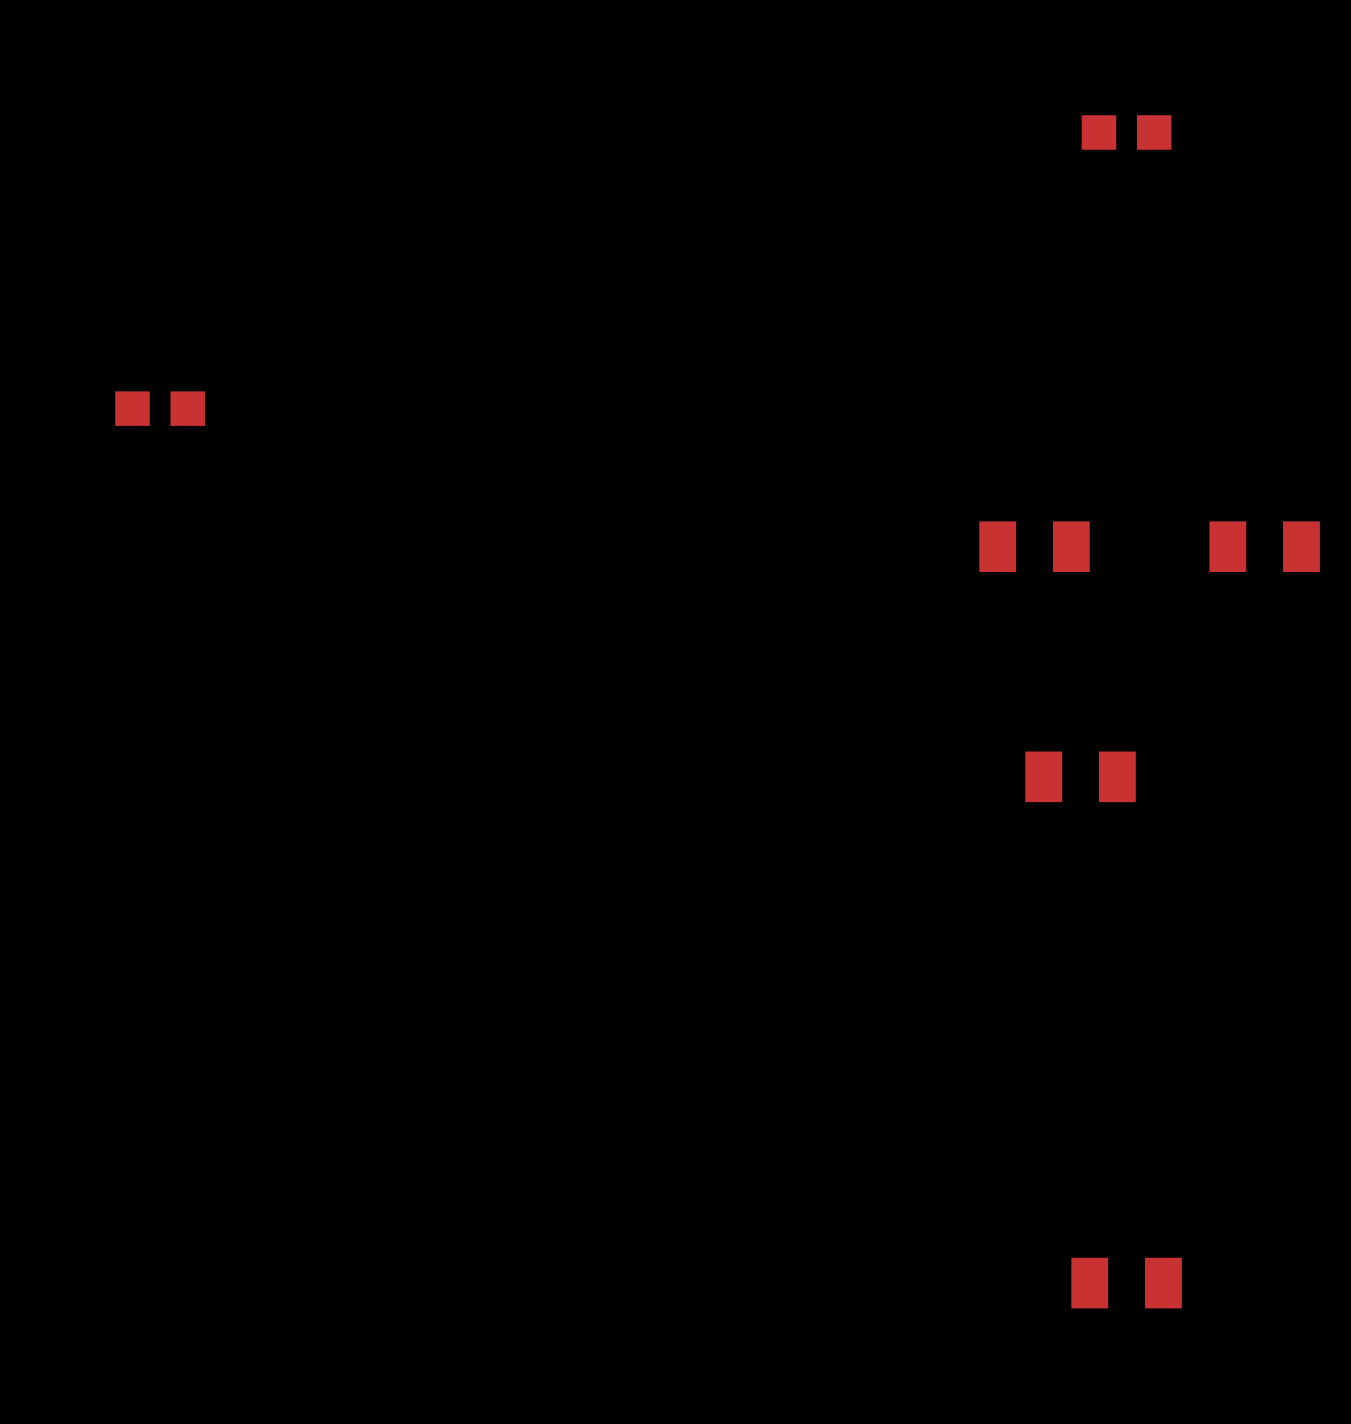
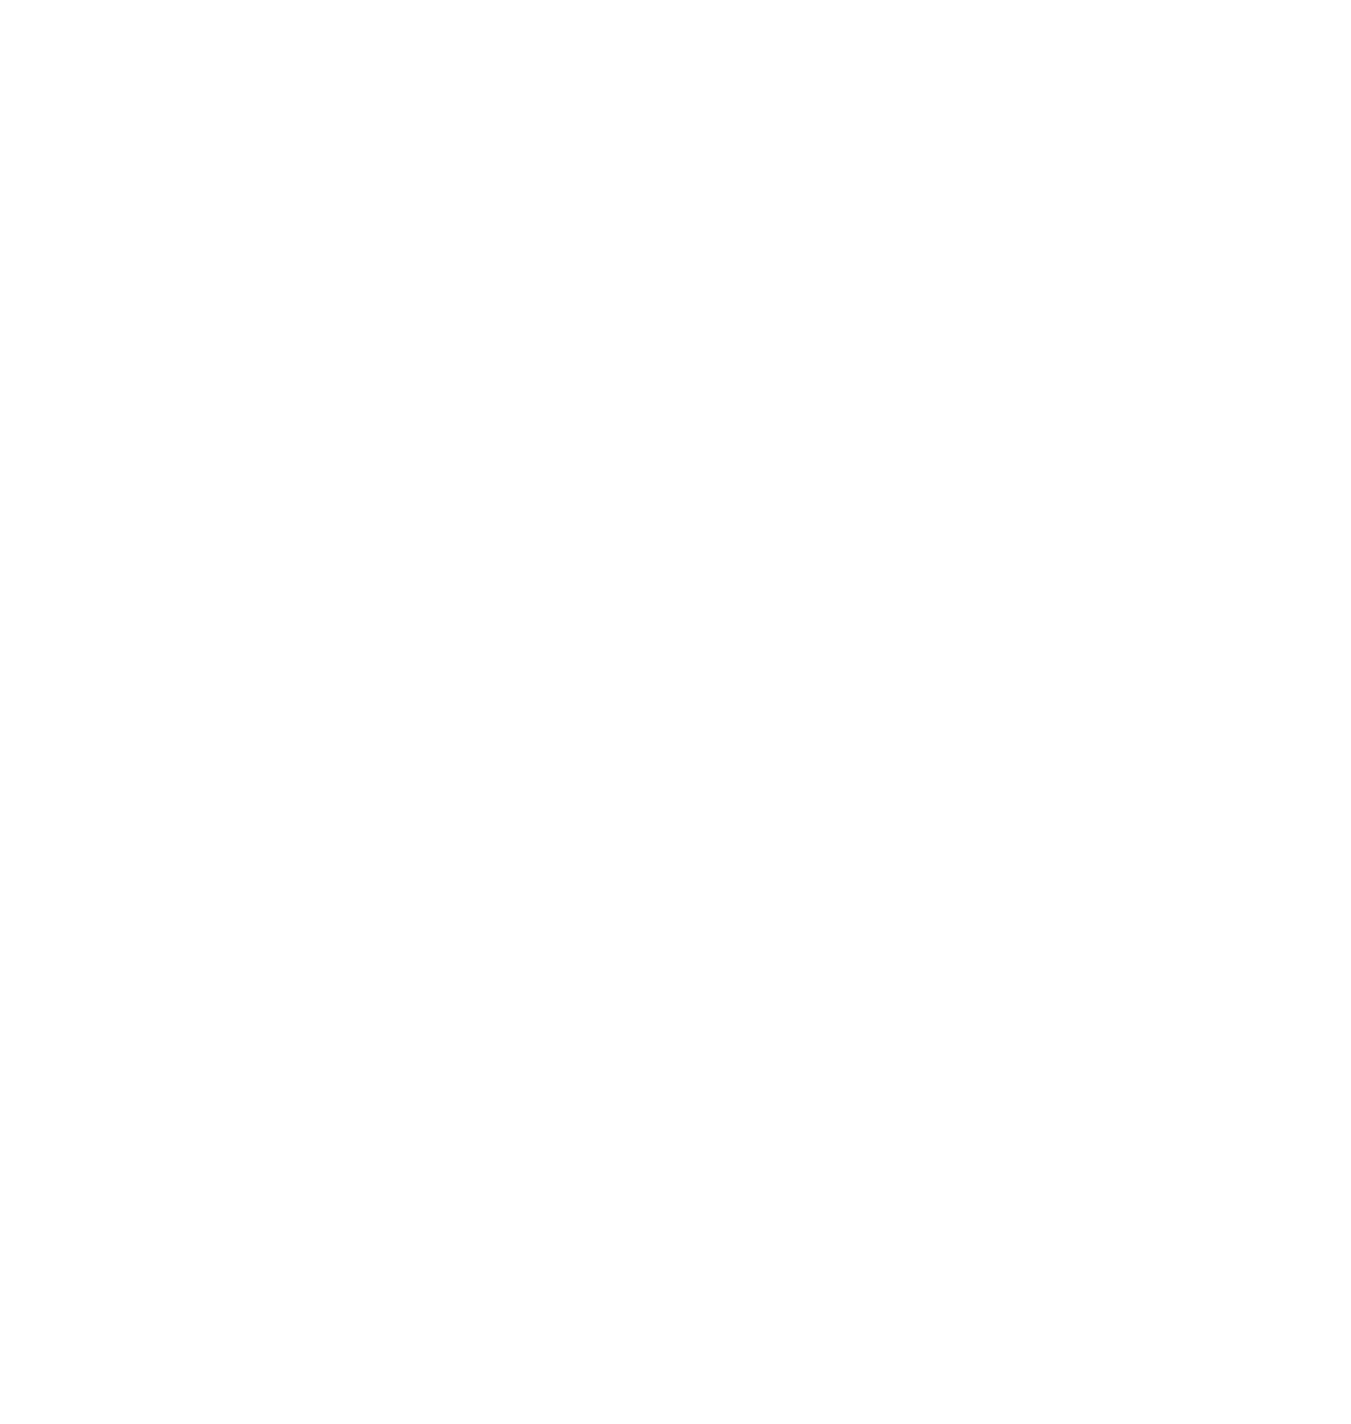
part: (1126, 132) -> none
part: (160, 408) -> none
part: (1034, 546) -> none
part: (1264, 546) -> none
part: (1080, 776) -> none
part: (1126, 1283) -> none

